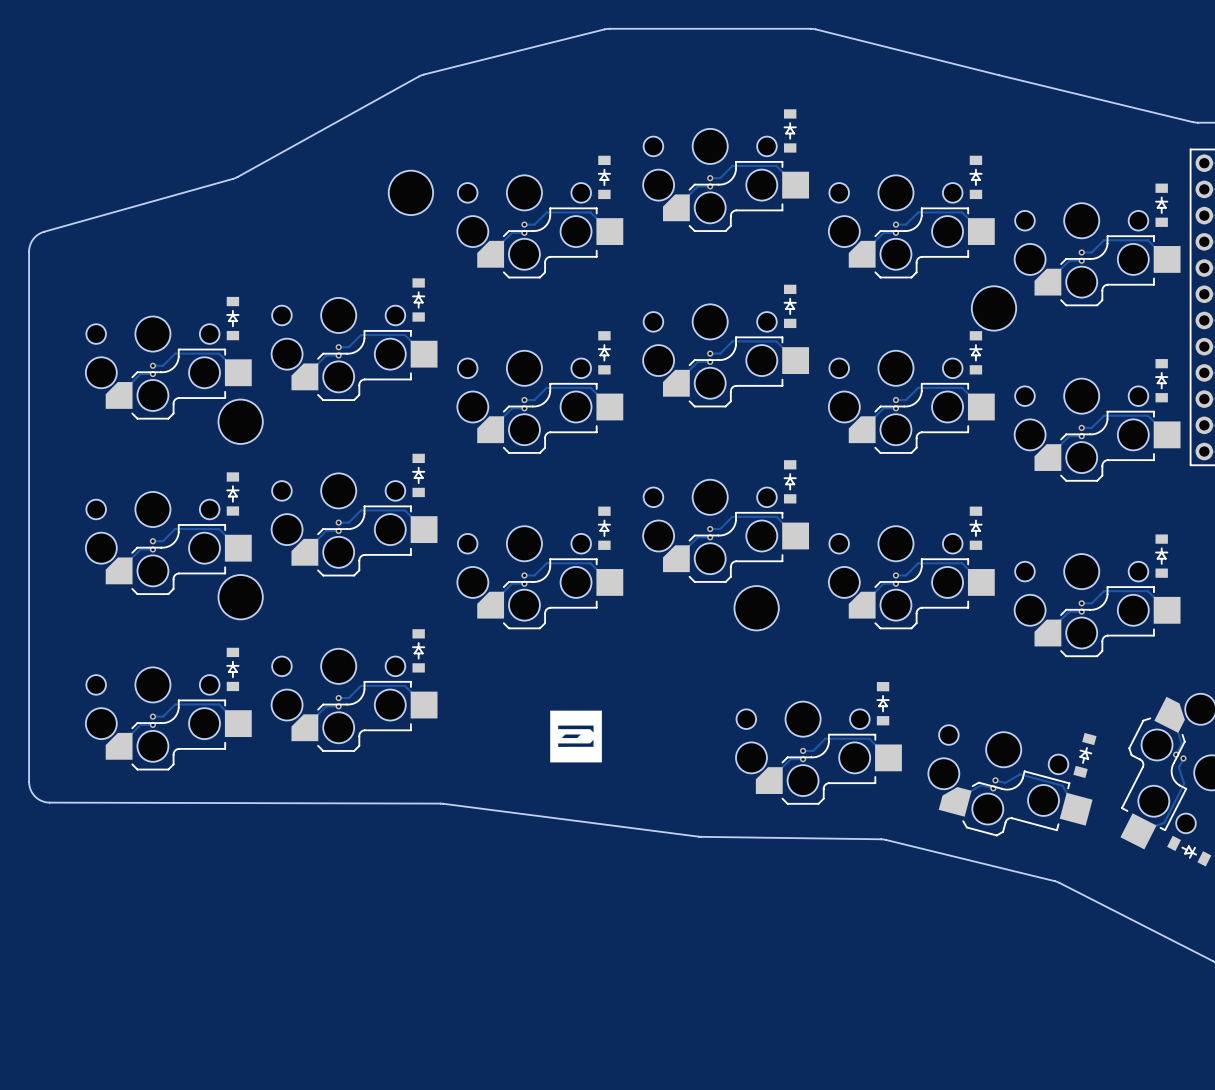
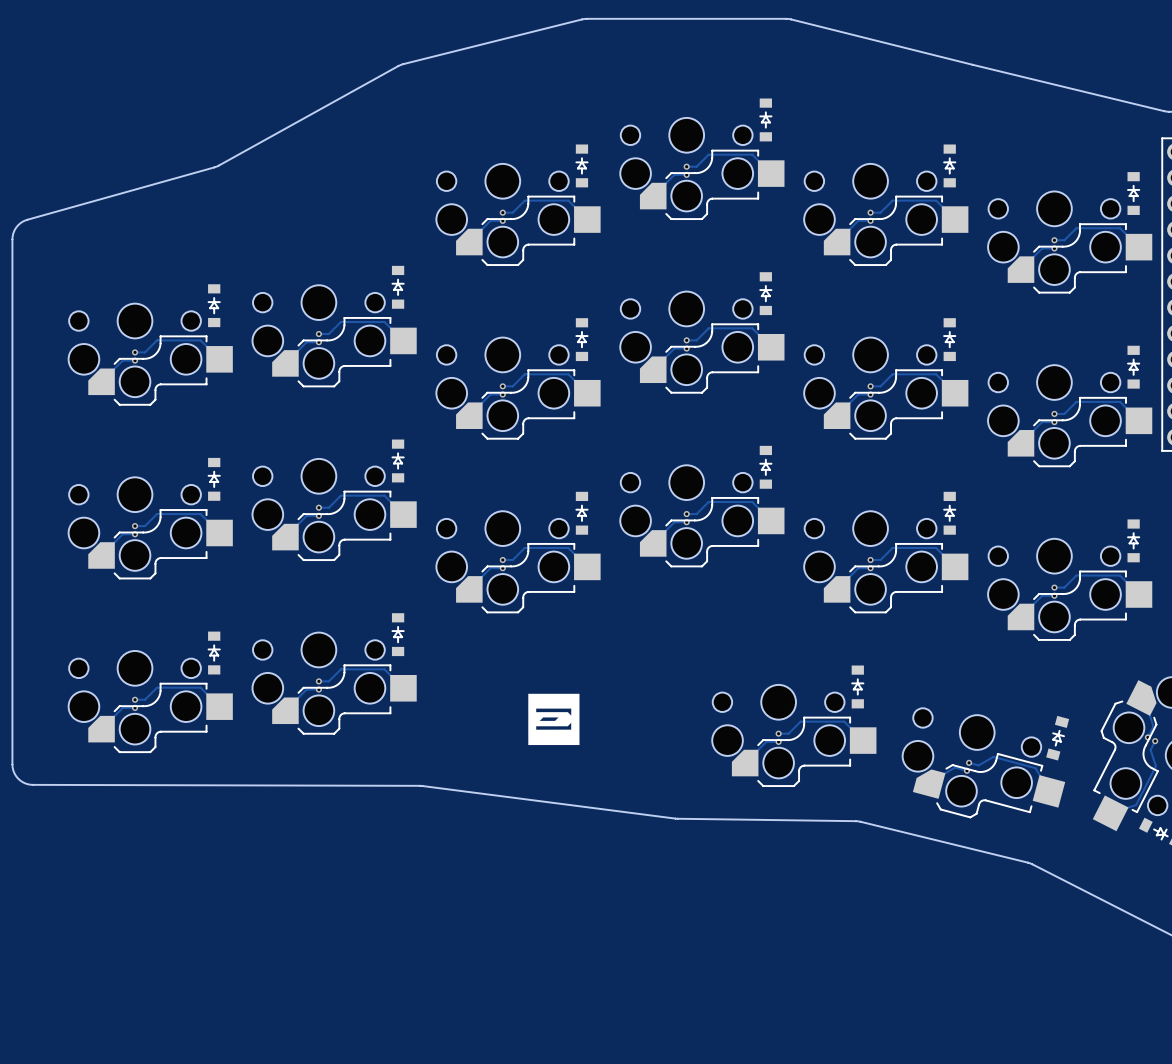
part: (410, 192) -> none
part: (994, 308) -> none
part: (240, 421) -> none
part: (240, 597) -> none
part: (756, 608) -> none

